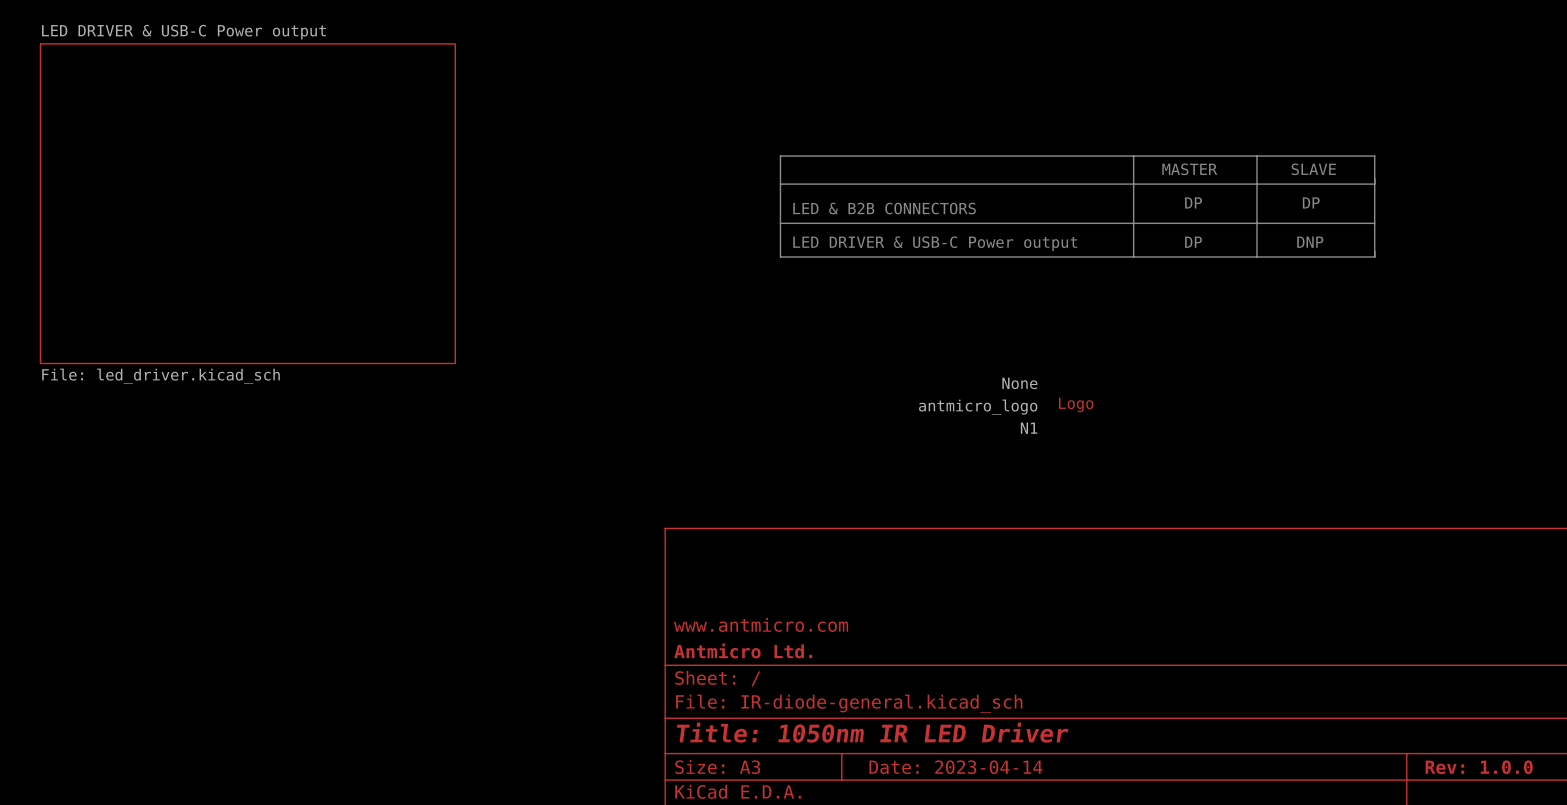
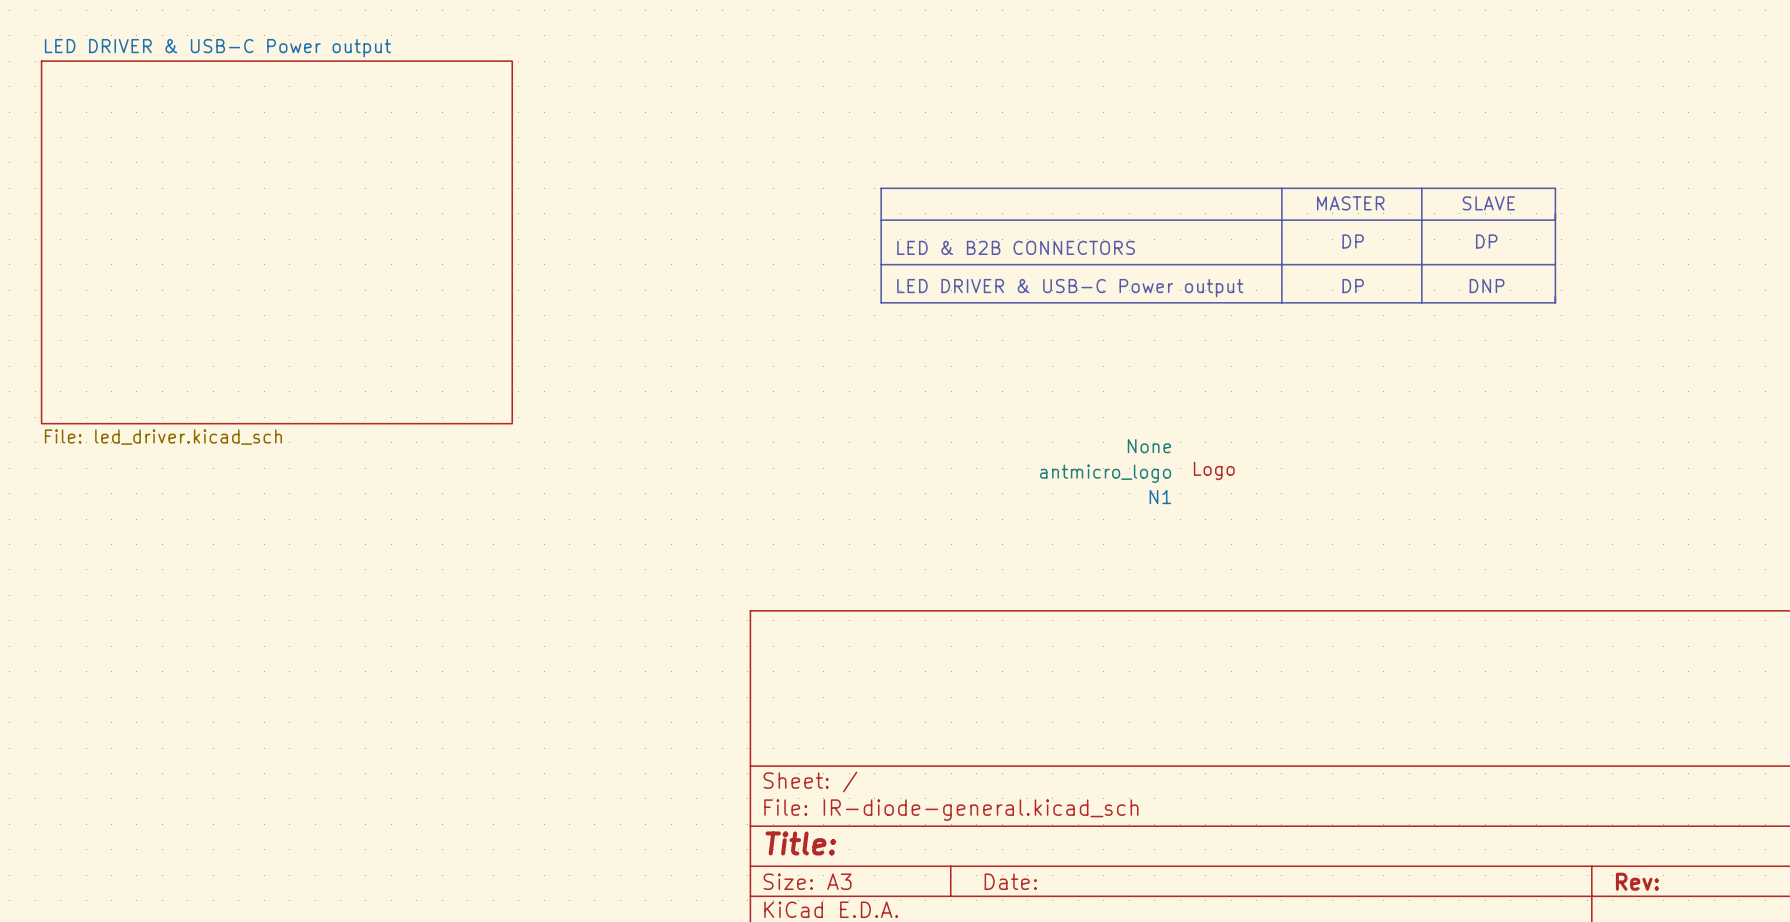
title block: www.antmicro.com (761, 624) -> none
title block: Antmicro Ltd. (743, 650) -> none
title block: Title: 1050nm IR LED Driver (872, 732) -> Title: (800, 843)
title block: Date: 2023-04-14 (955, 767) -> Date: (1010, 881)
title block: Rev: 1.0.0 (1479, 767) -> Rev: (1637, 881)

